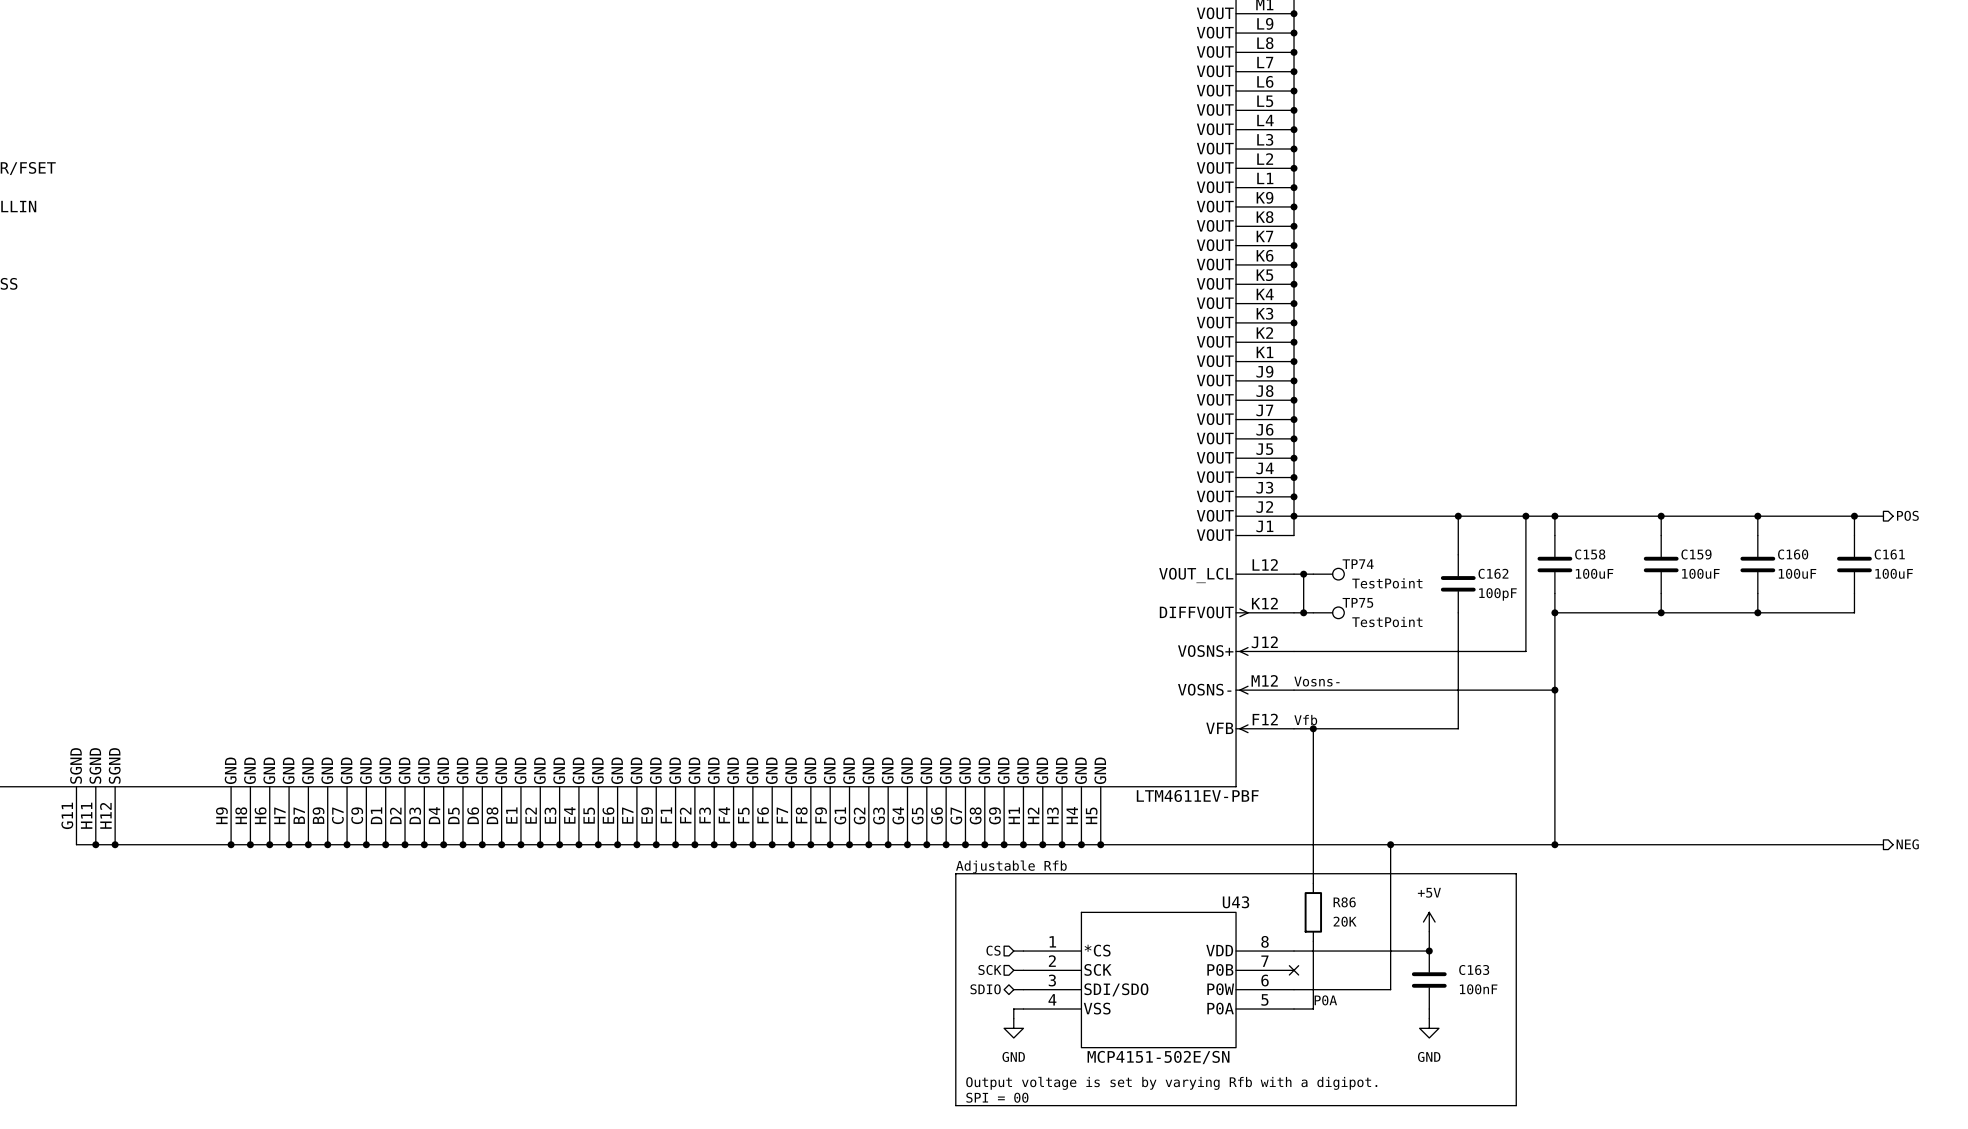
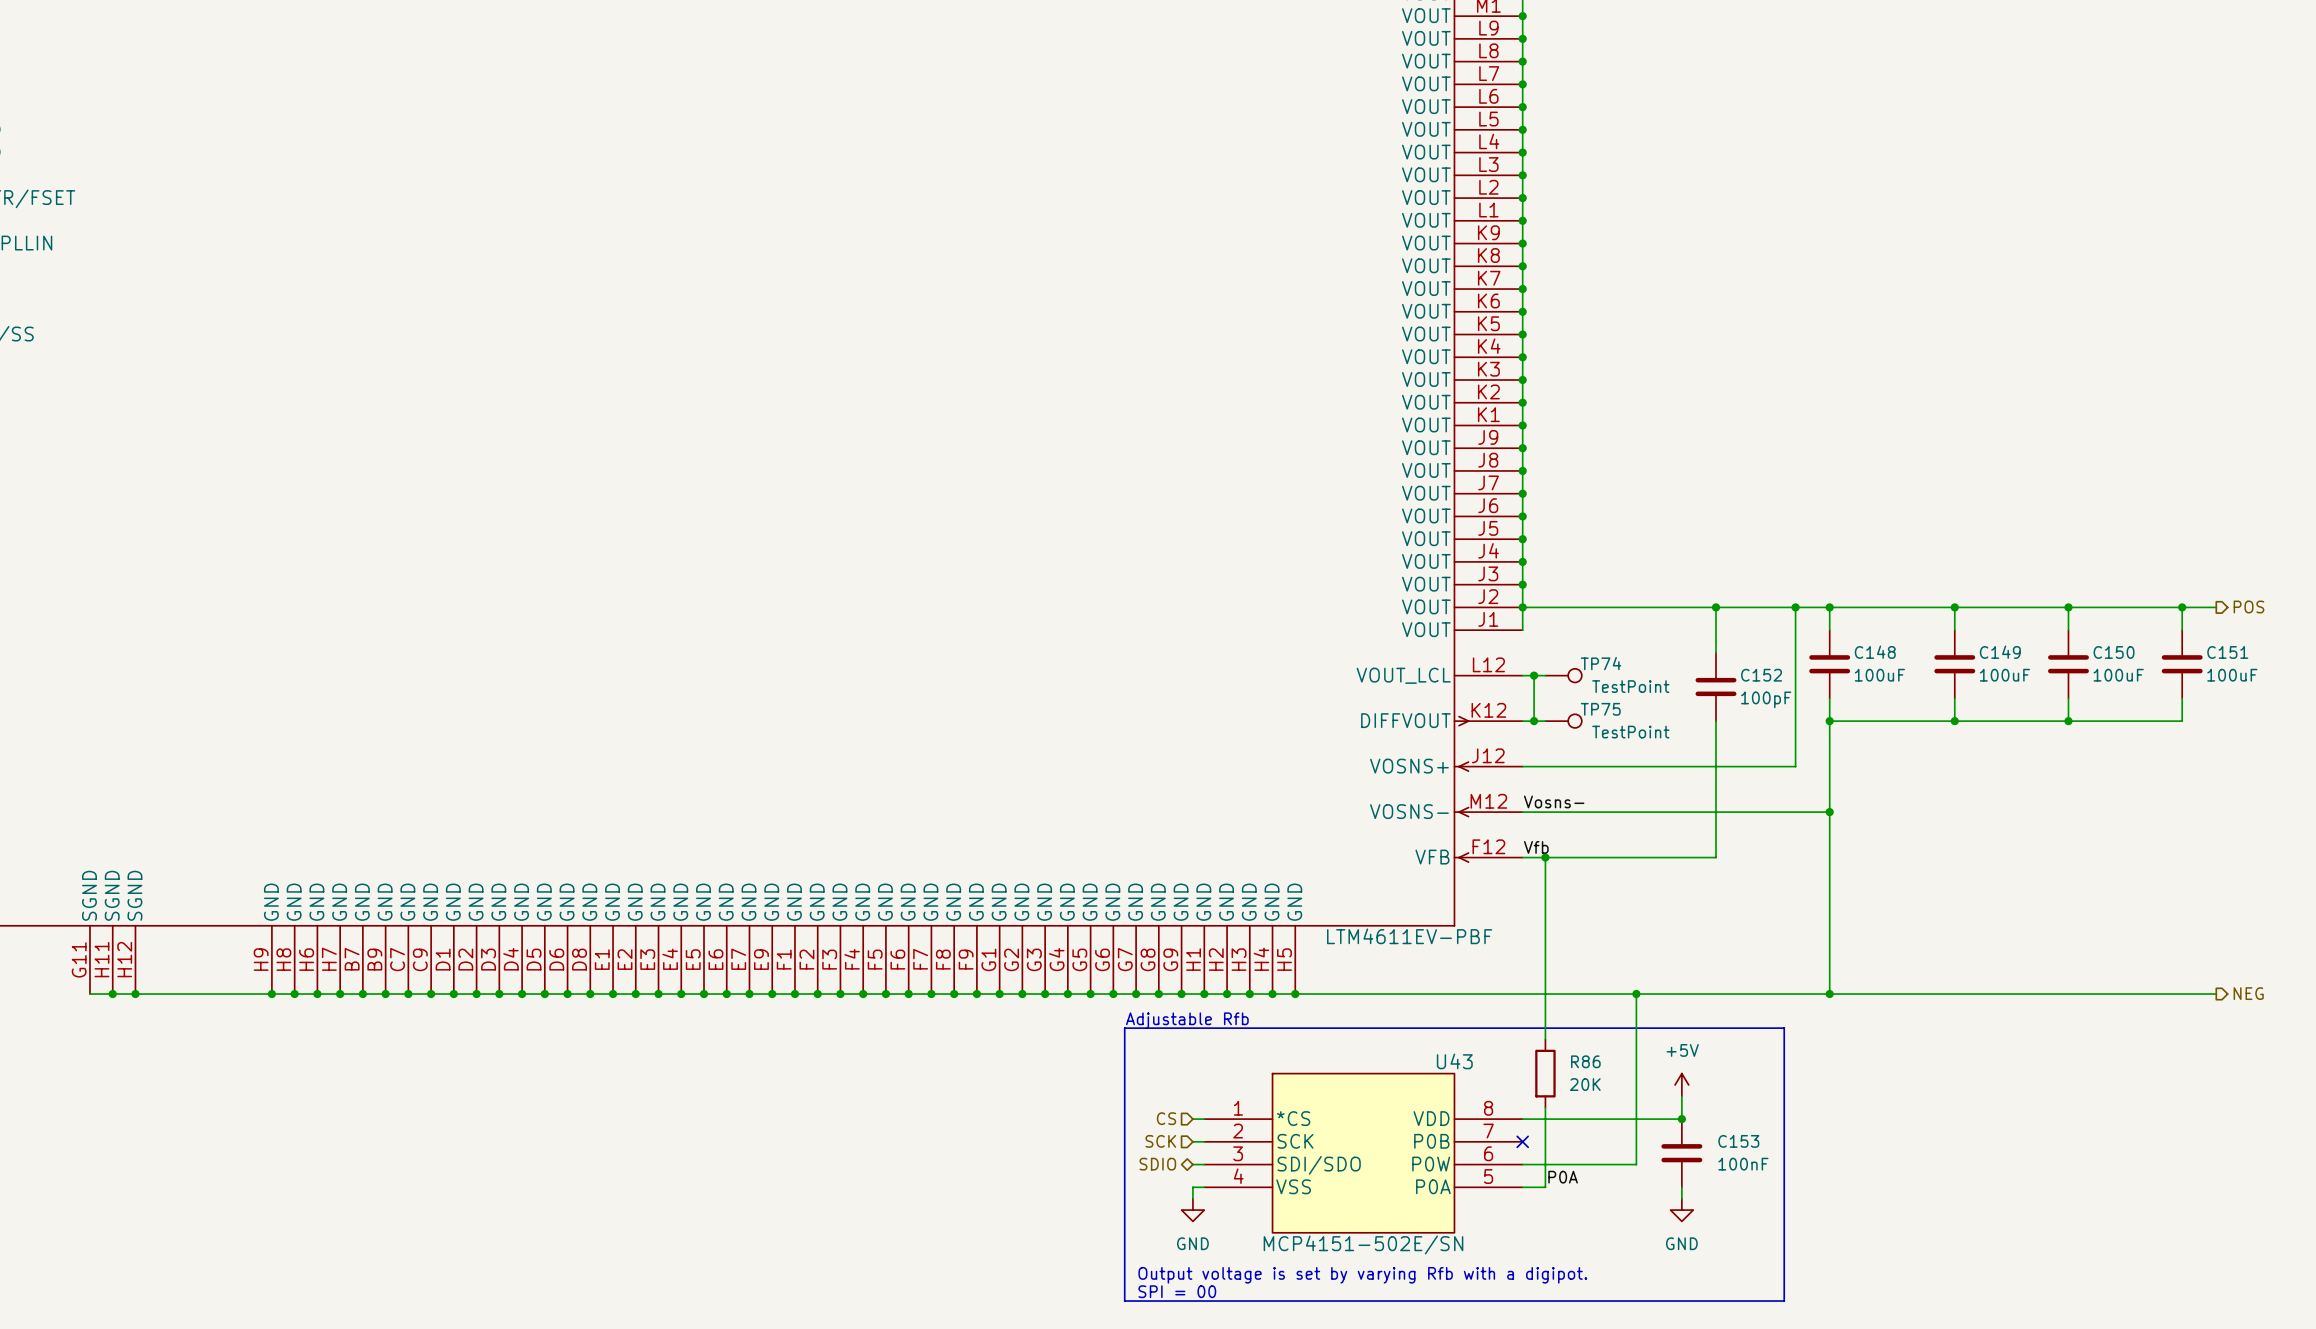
C158 name: C158 (1590, 554) -> C148 (1875, 652)
C159 name: C159 (1696, 554) -> C149 (2000, 652)
C160 name: C160 (1793, 554) -> C150 (2114, 652)
C161 name: C161 (1889, 554) -> C151 (2227, 652)
C162 name: C162 (1493, 573) -> C152 (1761, 675)
C163 name: C163 (1474, 969) -> C153 (1738, 1141)

